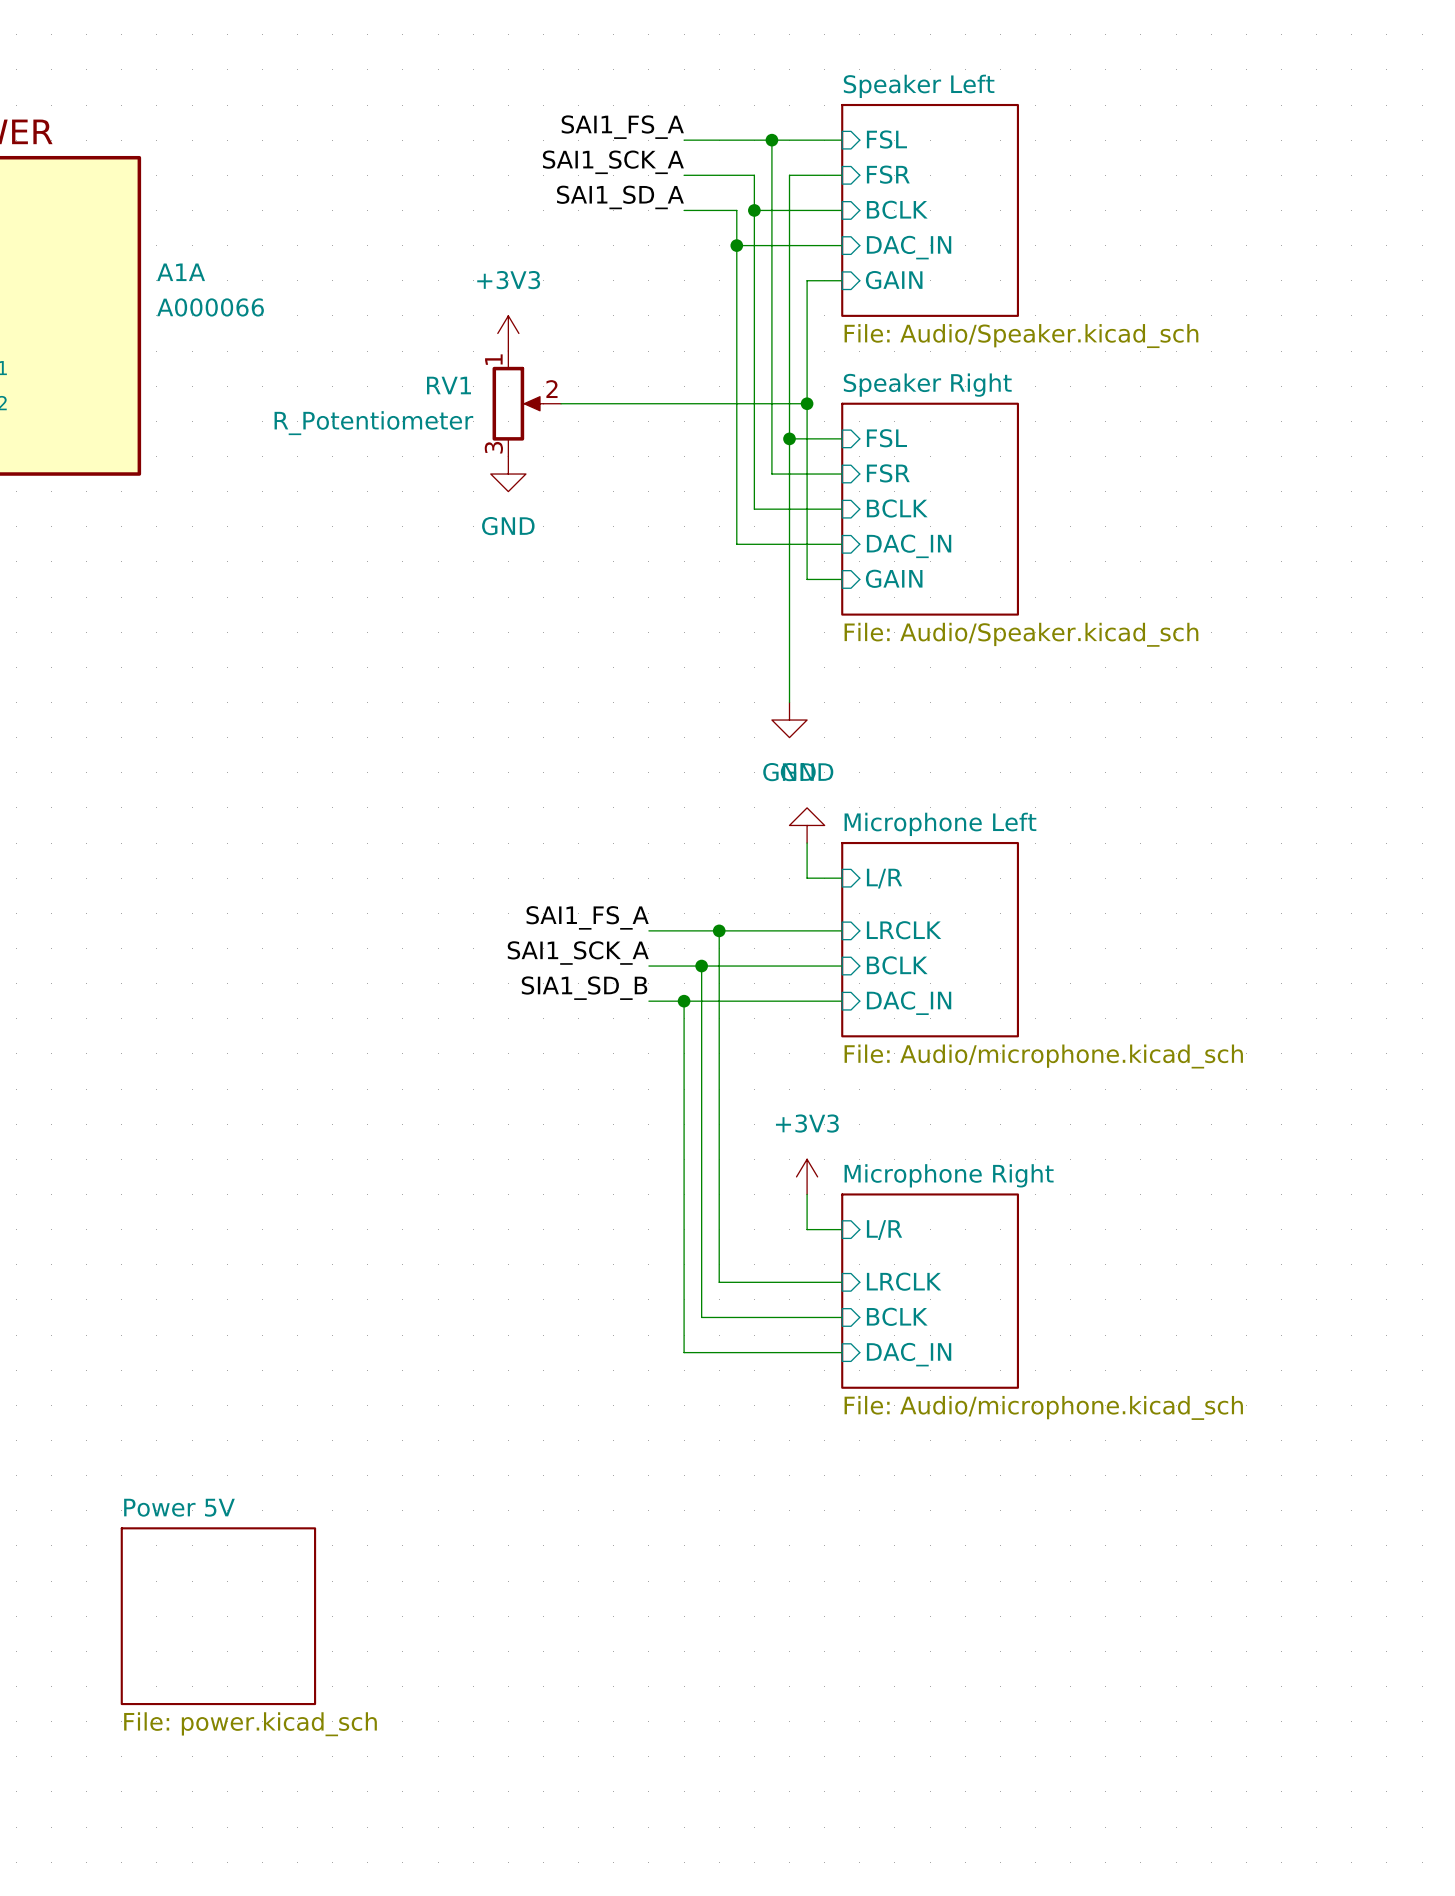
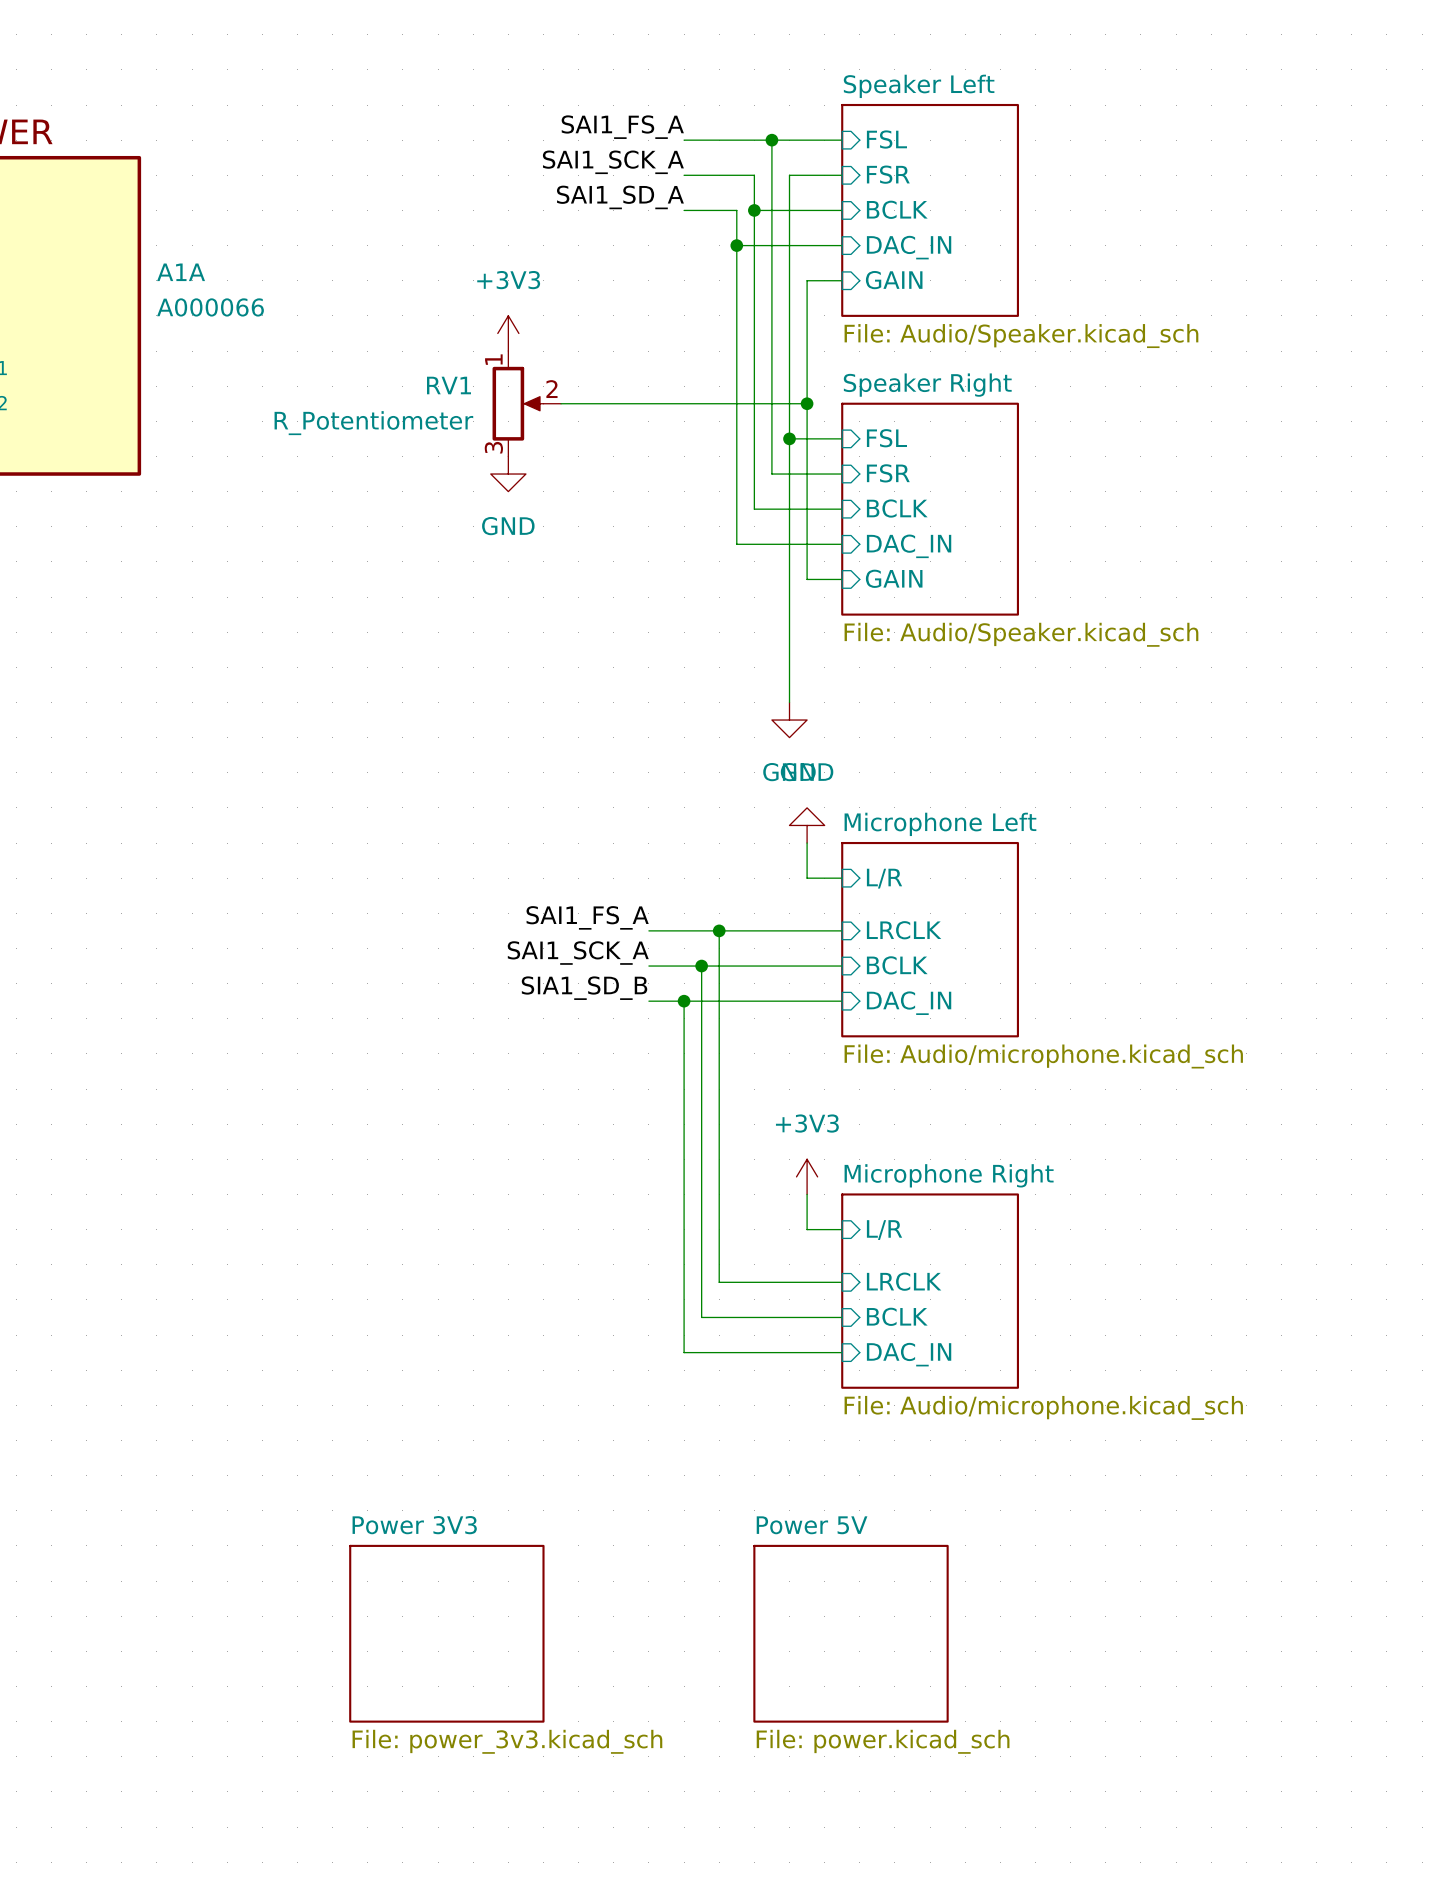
sheet Power 5V position: (218, 1616) -> (851, 1633)
sheet Power 3V3: none -> File: power_3v3.kicad_sch (446, 1633)

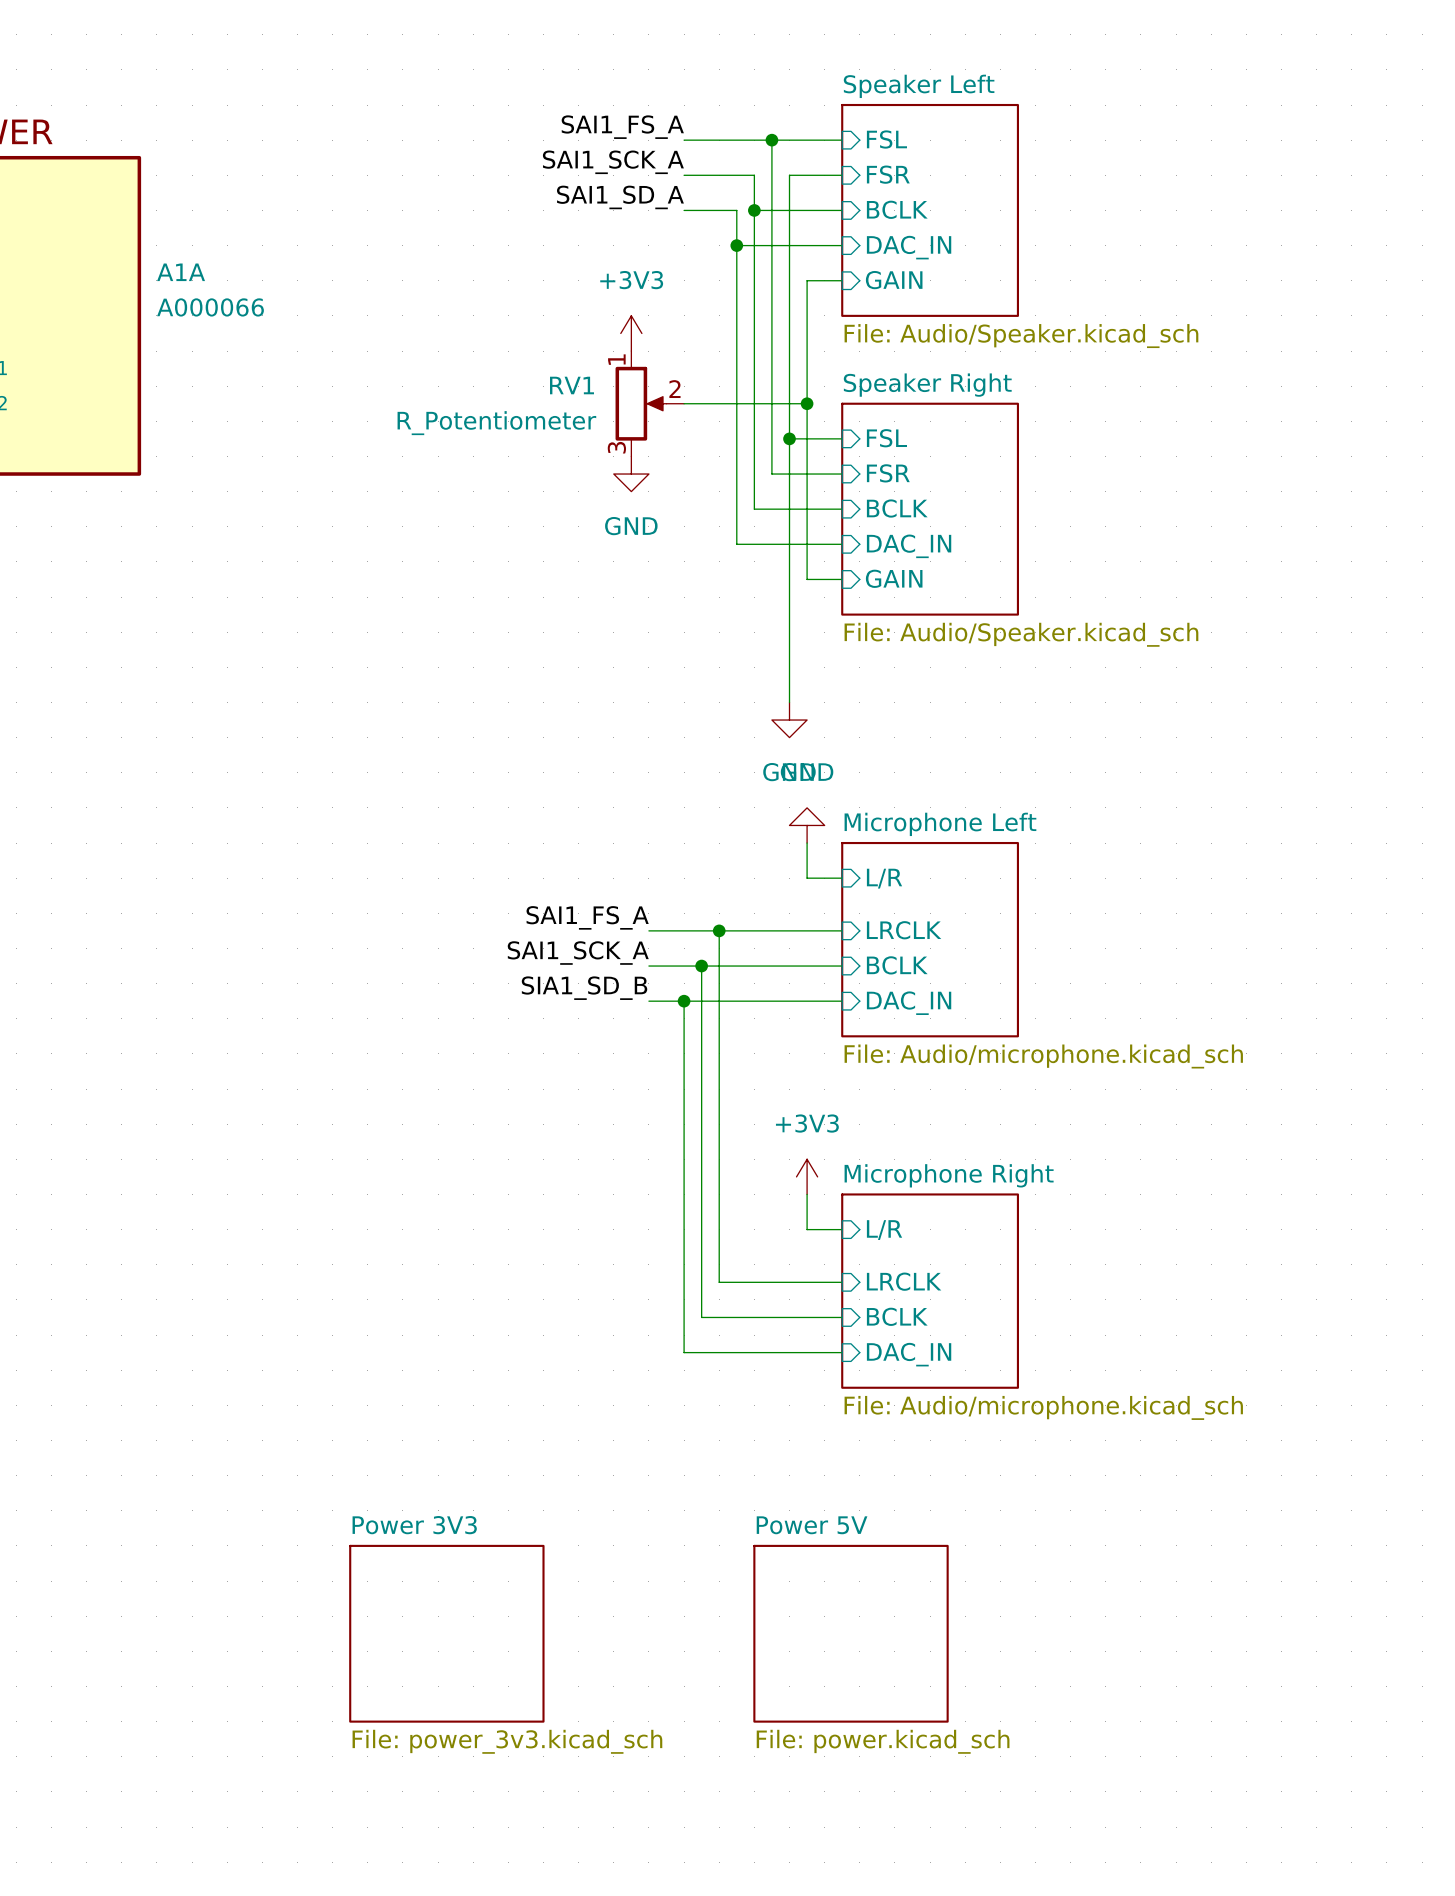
power symbol position: +3V3 (508, 333) -> +3V3 (631, 333)
RV1 position: (526, 403) -> (649, 403)
wire: (561, 403) (684, 403) -> none
power symbol position: GND (508, 474) -> GND (631, 474)

